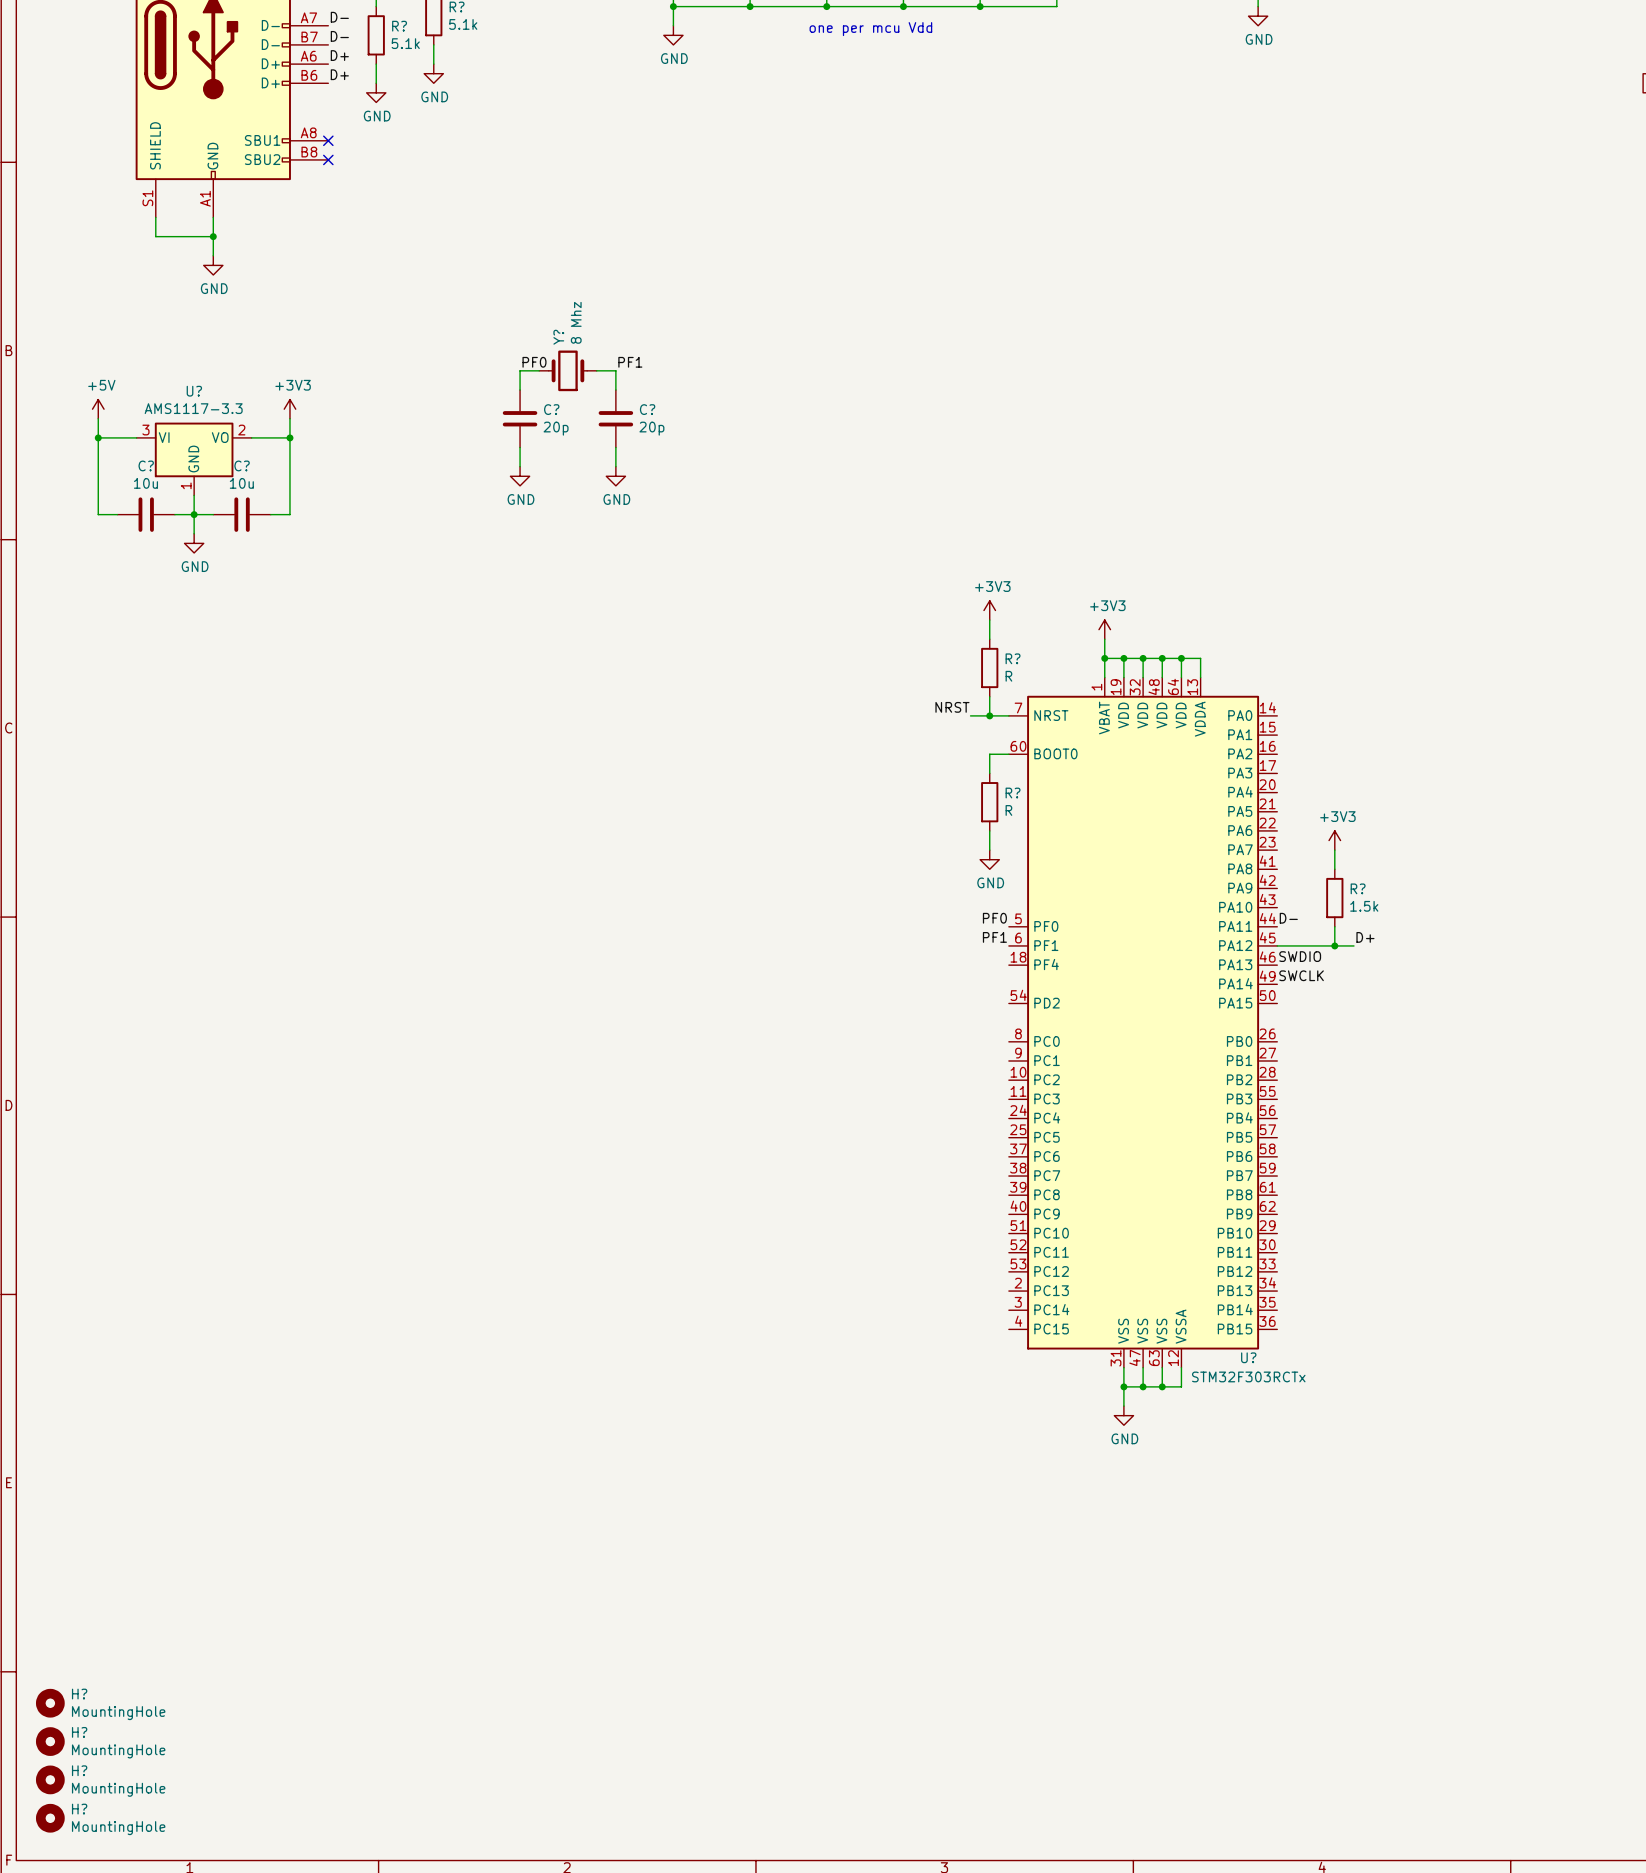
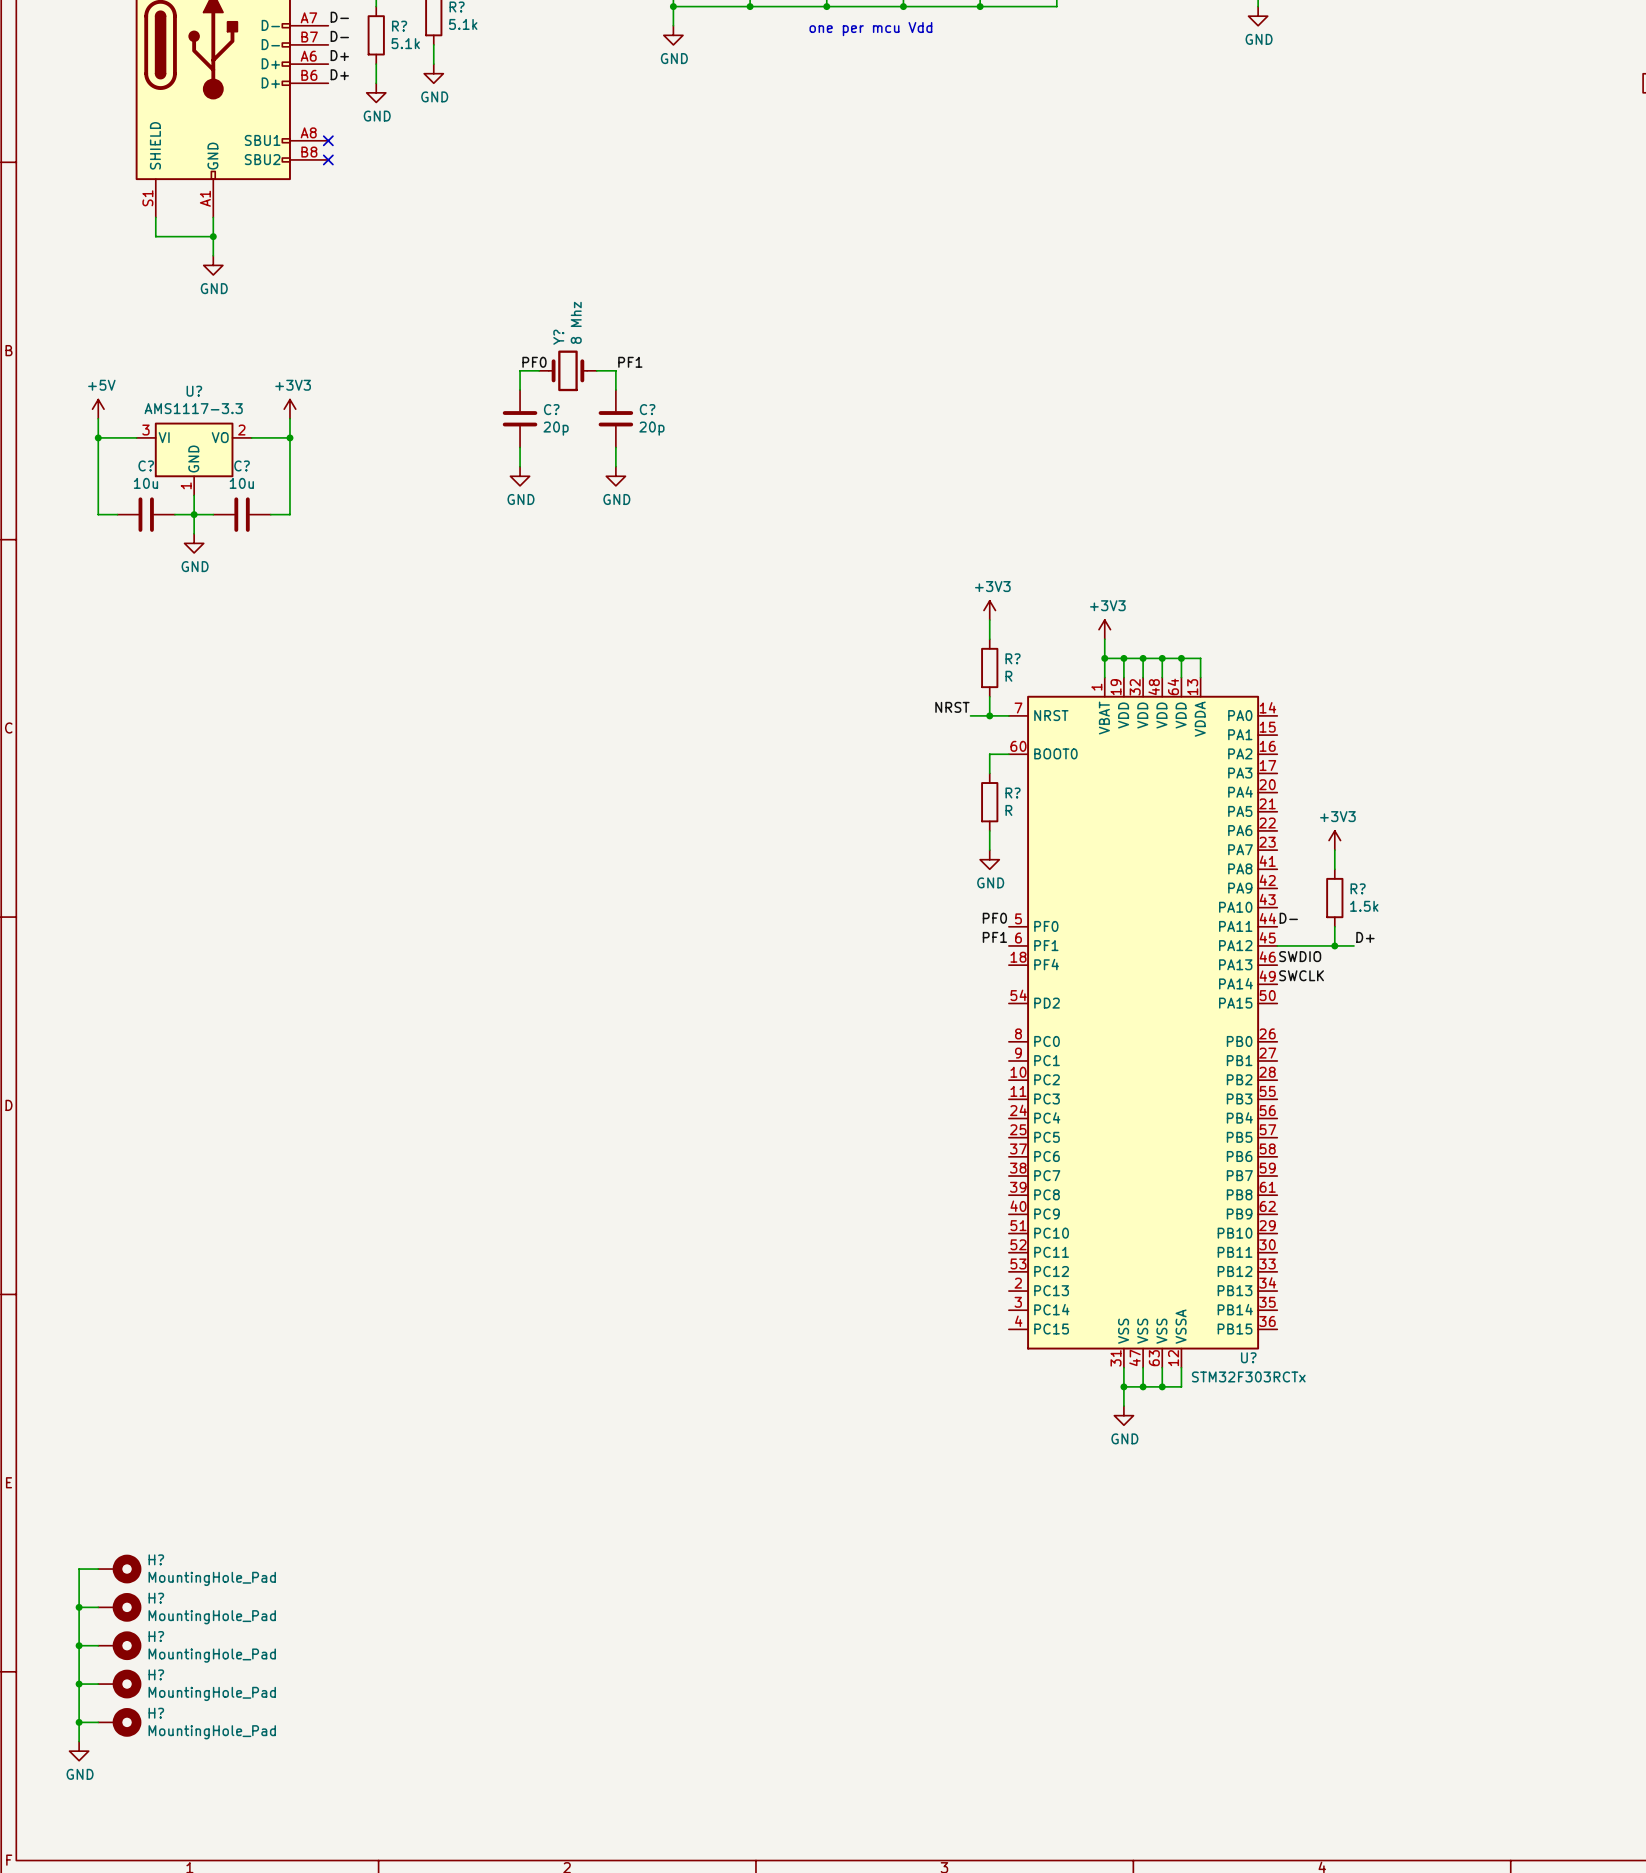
wire: none -> (98, 1569) (79, 1569) (79, 1741)
H?: none -> MountingHole_Pad (119, 1569)
wire: none -> (79, 1607) (98, 1607)
junction: none -> (79, 1607)
H?: none -> MountingHole_Pad (119, 1607)
wire: none -> (79, 1645) (98, 1645)
junction: none -> (79, 1645)
H?: none -> MountingHole_Pad (119, 1645)
wire: none -> (79, 1684) (98, 1684)
junction: none -> (79, 1684)
H?: none -> MountingHole_Pad (119, 1684)
H?: MountingHole (50, 1703) -> none
wire: none -> (79, 1722) (98, 1722)
junction: none -> (79, 1722)
H?: none -> MountingHole_Pad (119, 1722)
H?: MountingHole (50, 1741) -> none
power symbol: none -> GND (79, 1751)
H?: MountingHole (50, 1779) -> none
H?: MountingHole (50, 1818) -> none

